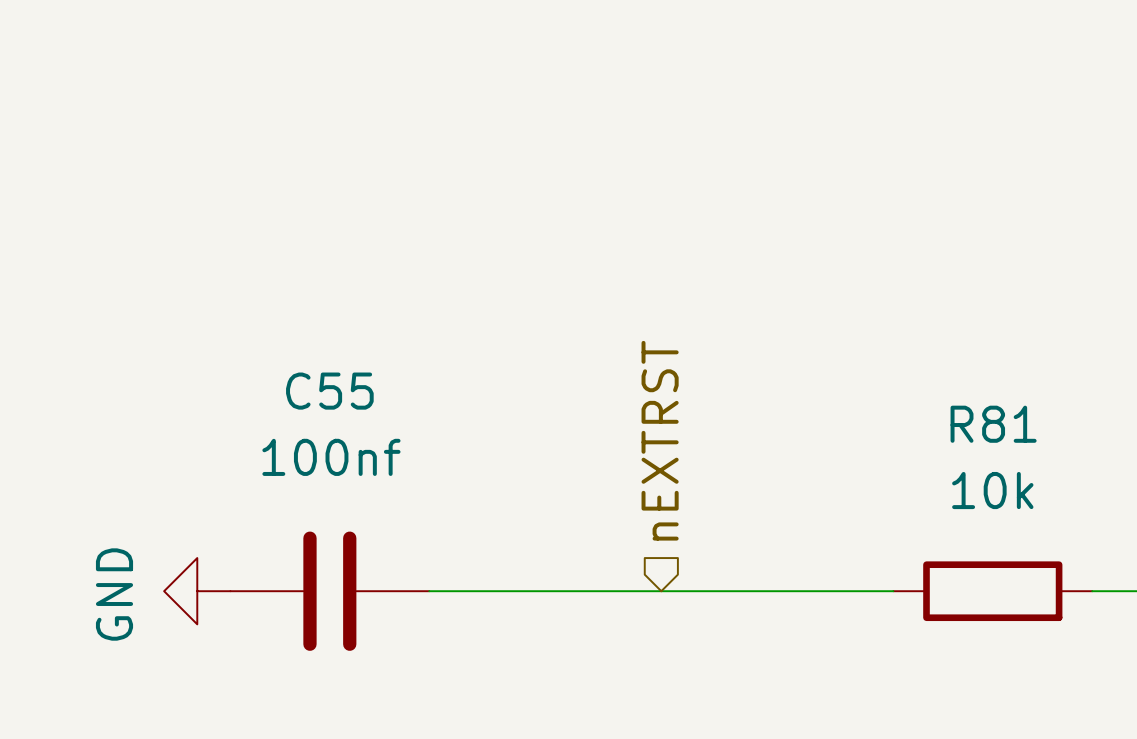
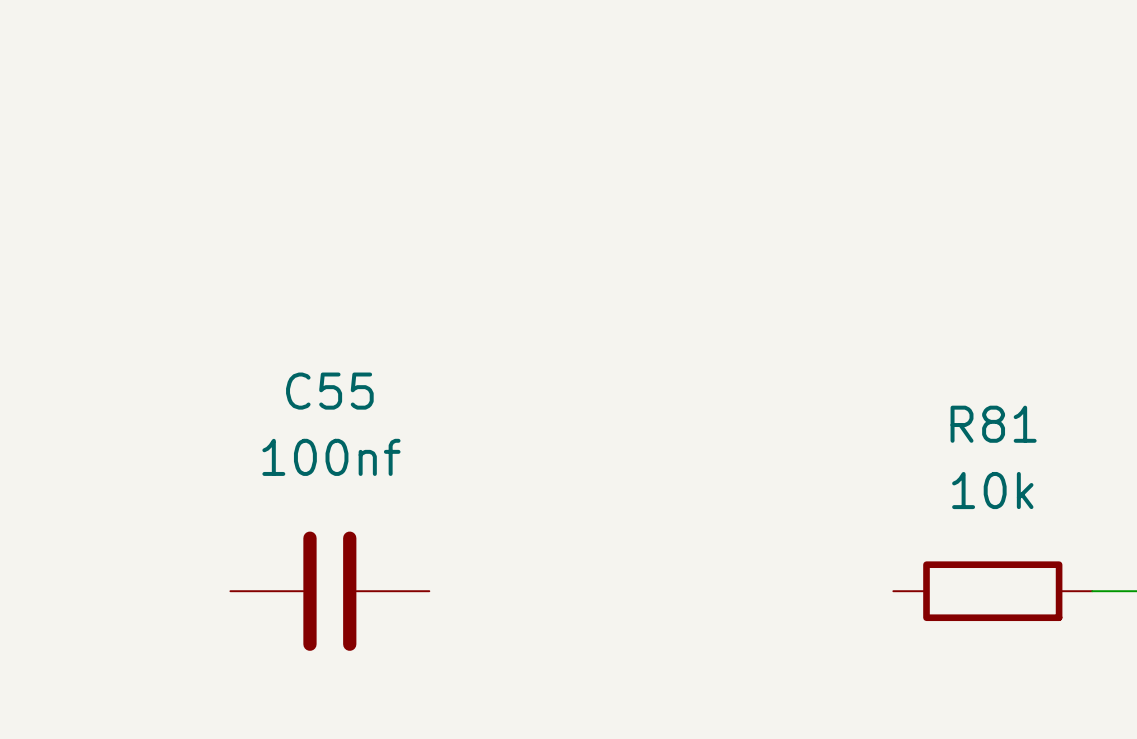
hierarchical label: nEXTRST (660, 440) -> none
power symbol: GND (197, 591) -> none
wire: (429, 591) (893, 591) -> none

